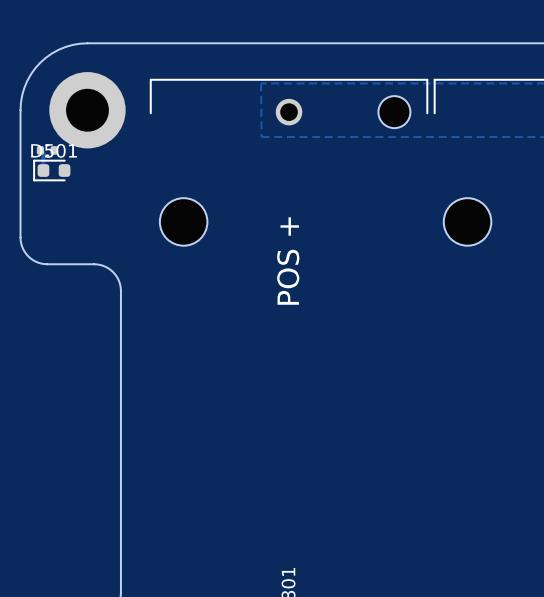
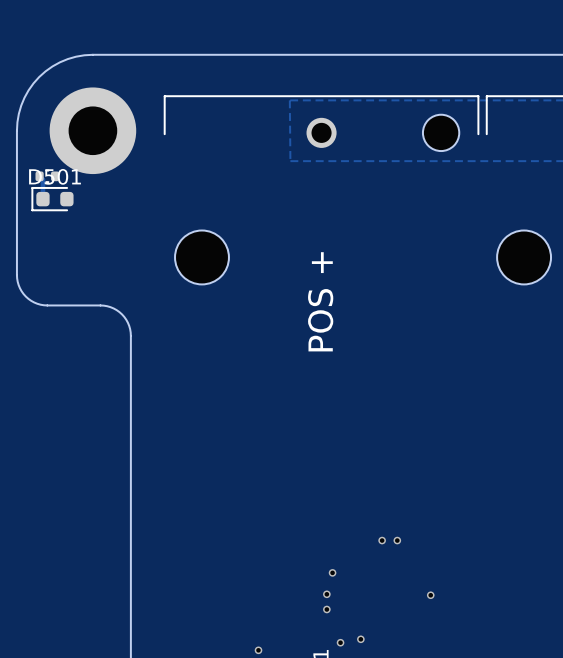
via: none -> (382, 540)
via: none -> (397, 540)
via: none -> (332, 572)
via: none -> (326, 594)
via: none -> (430, 595)
via: none -> (326, 609)
via: none -> (360, 639)
via: none -> (340, 642)
via: none -> (258, 650)

